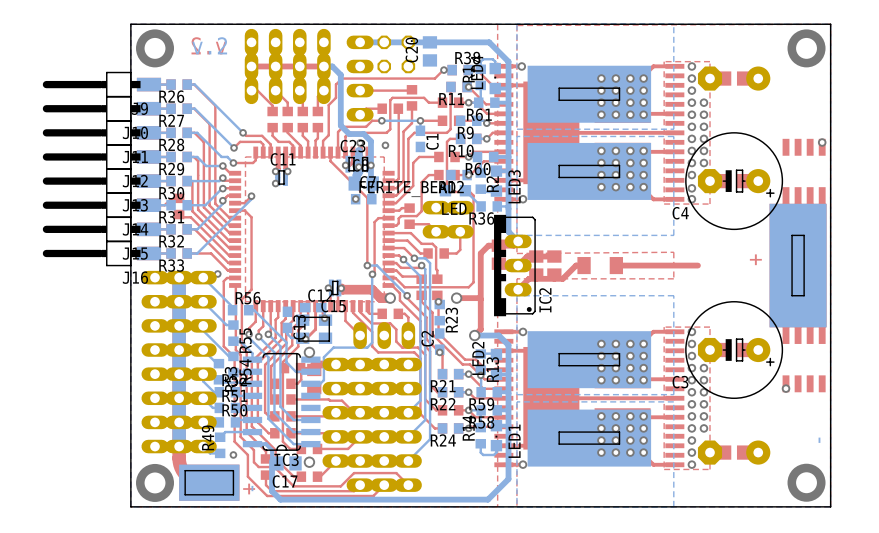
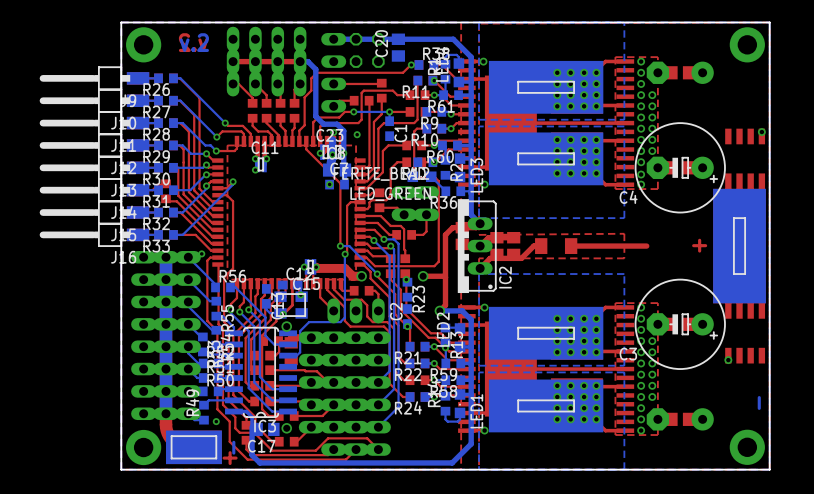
LED name: LED (454, 208) -> LED_GREEN (390, 194)

